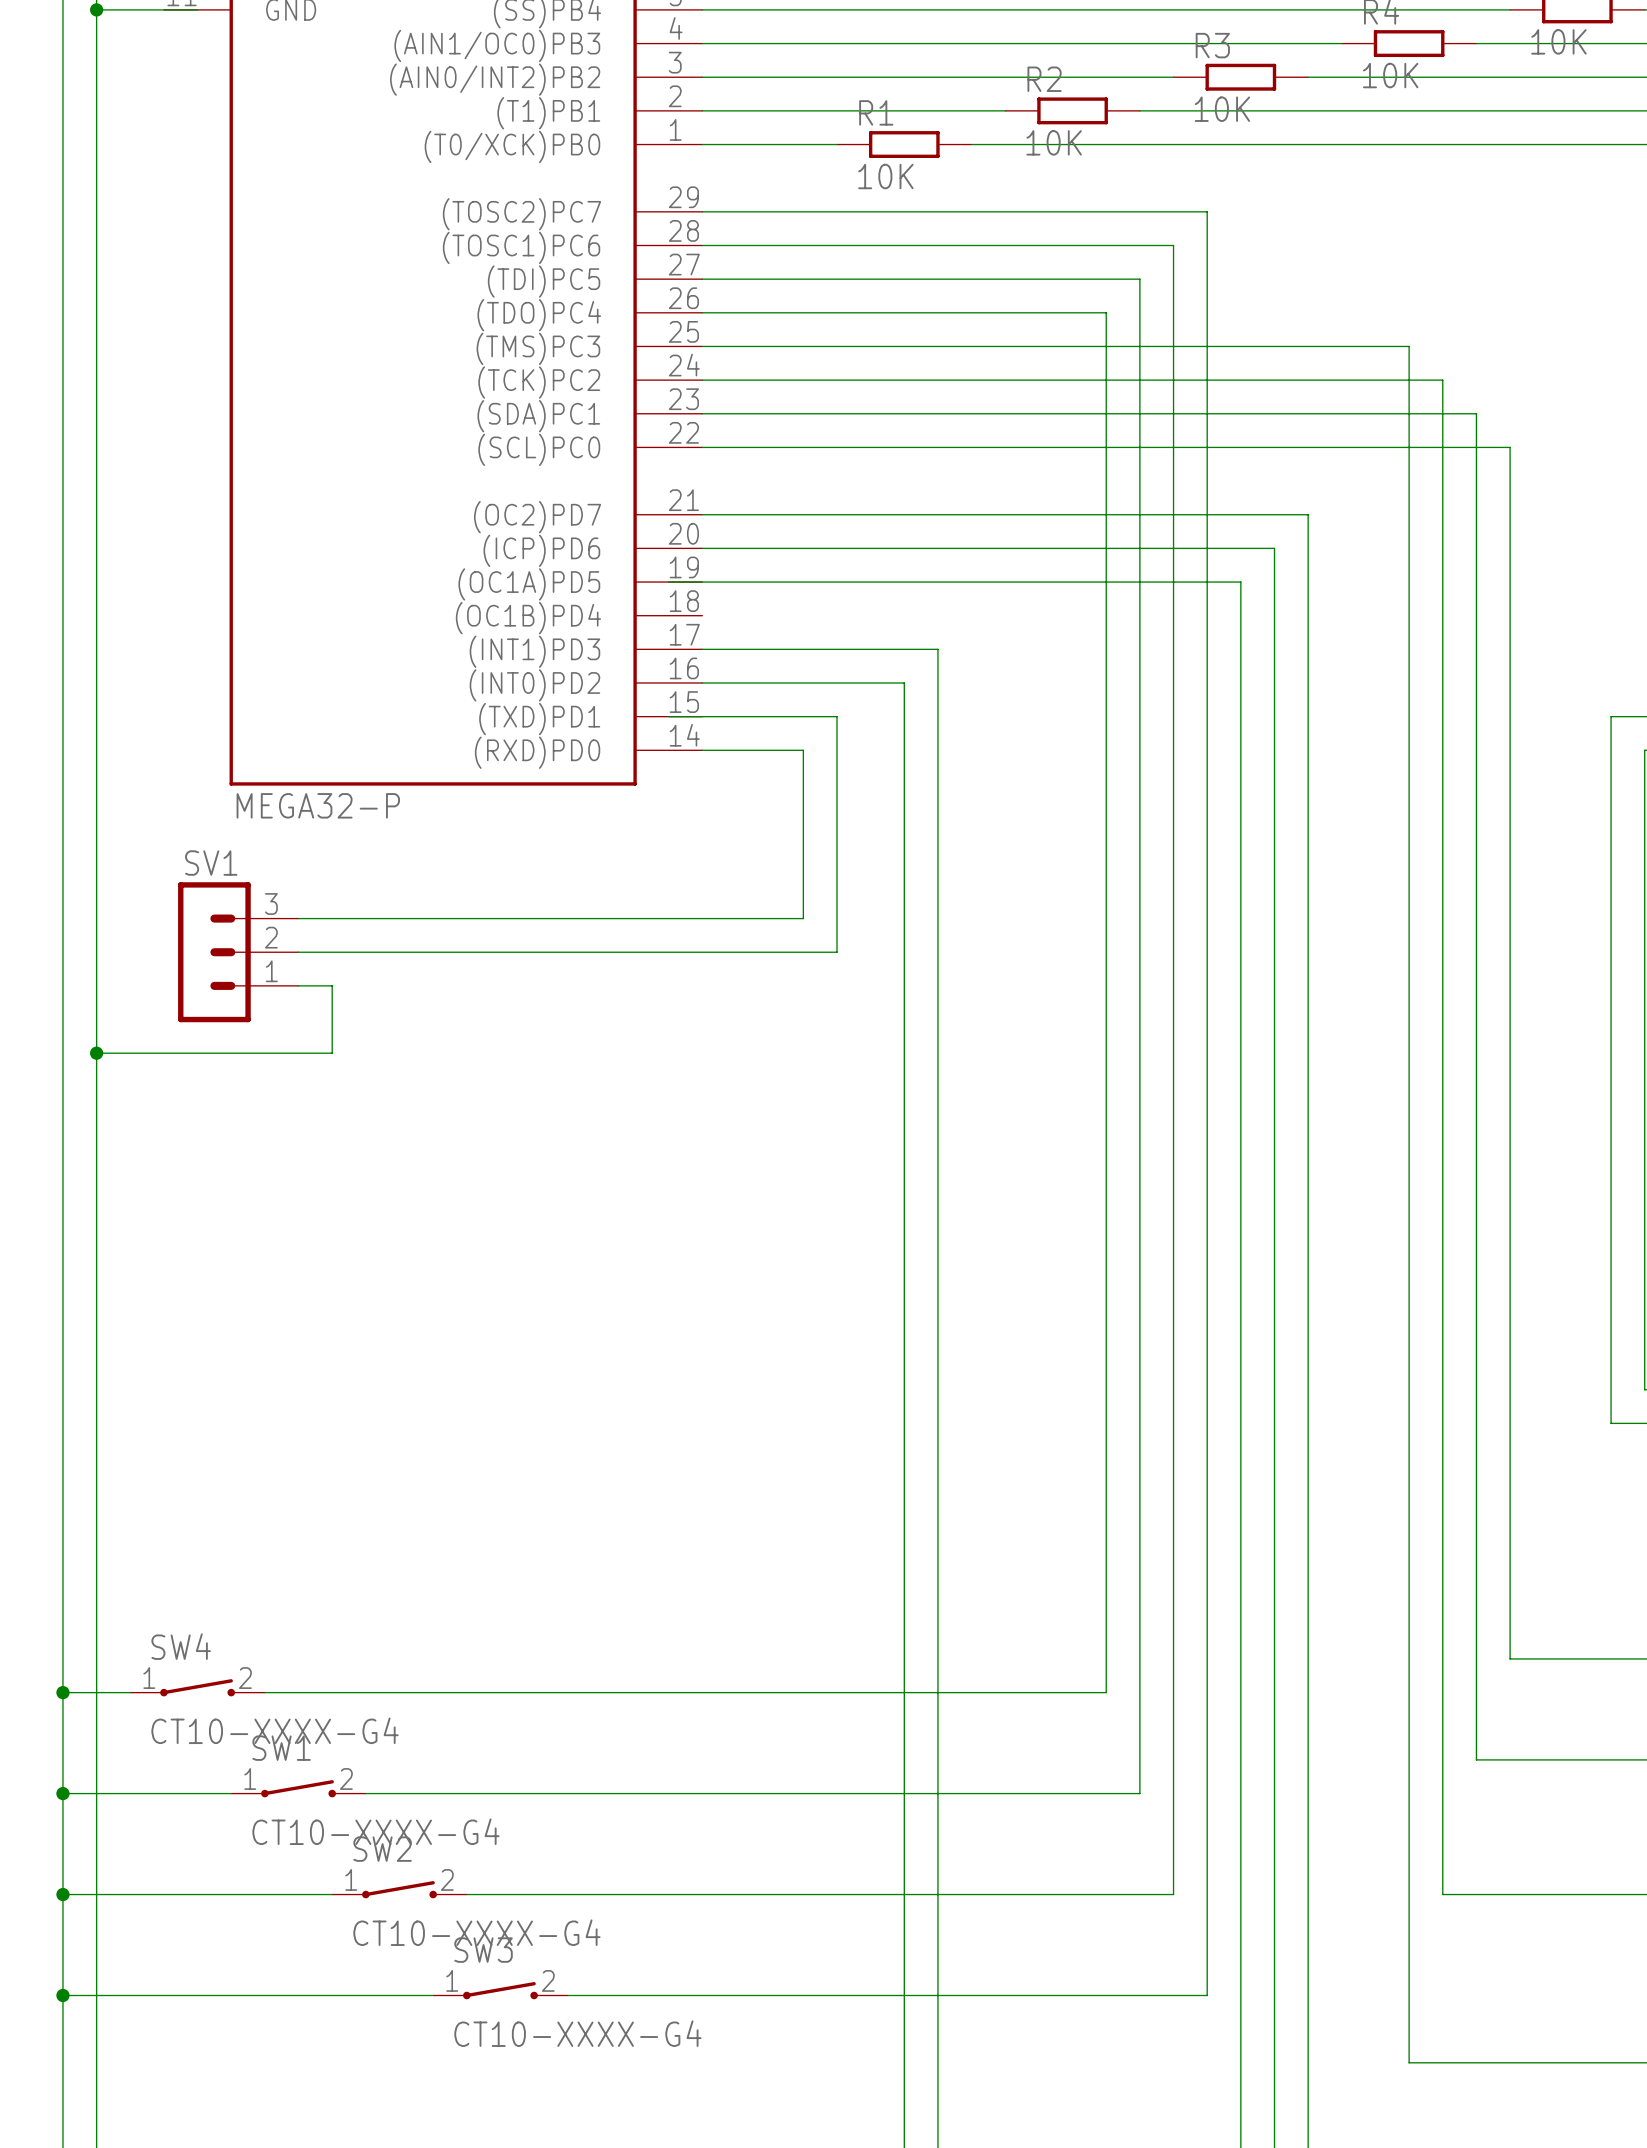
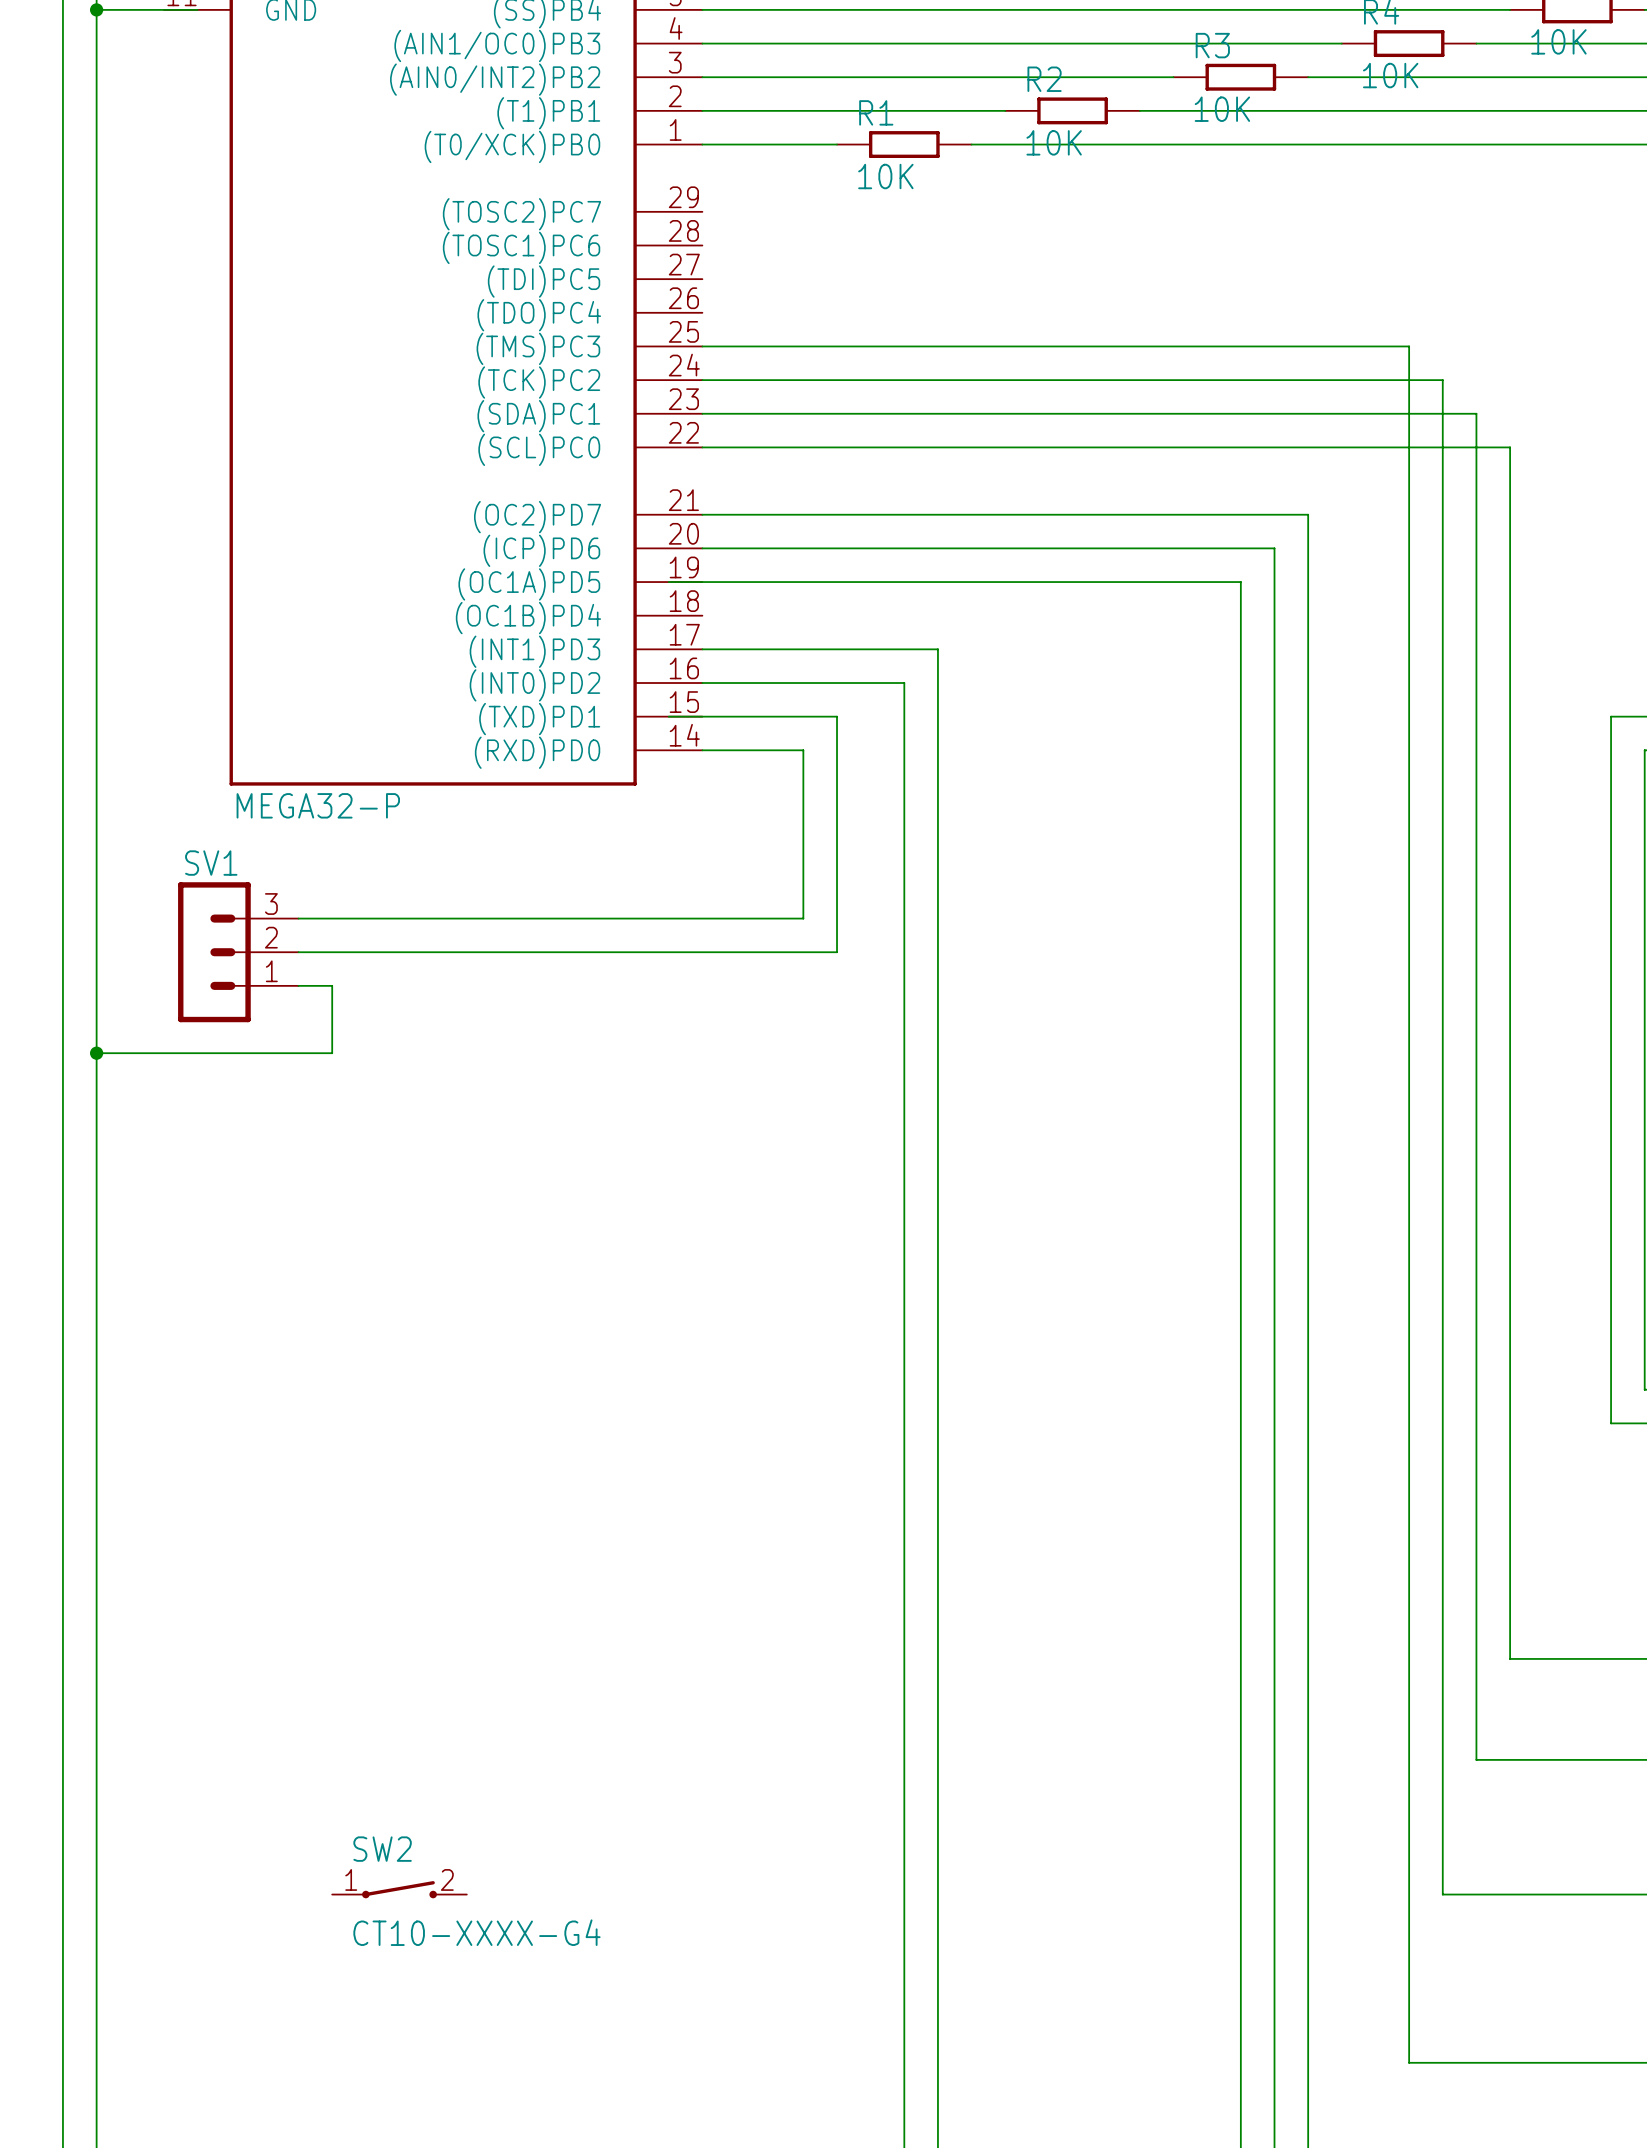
wire: (702, 211) (1207, 211) (1207, 1995) (567, 1995) -> none
wire: (702, 245) (1173, 245) (1173, 1894) (466, 1894) -> none
wire: (702, 279) (1139, 279) (1139, 1793) (365, 1793) -> none
wire: (702, 312) (1106, 312) (1106, 1692) (264, 1692) -> none
SW4: CT10-XXXX-G4 (197, 1687) -> none
wire: (62, 1692) (130, 1692) -> none
junction: (62, 1692) -> none
SW1: CT10-XXXX-G4 (298, 1788) -> none
wire: (62, 1793) (231, 1793) -> none
junction: (62, 1793) -> none
wire: (62, 1894) (332, 1894) -> none
junction: (62, 1894) -> none
SW3: CT10-XXXX-G4 (500, 1990) -> none
wire: (62, 1995) (433, 1995) -> none
junction: (62, 1995) -> none

